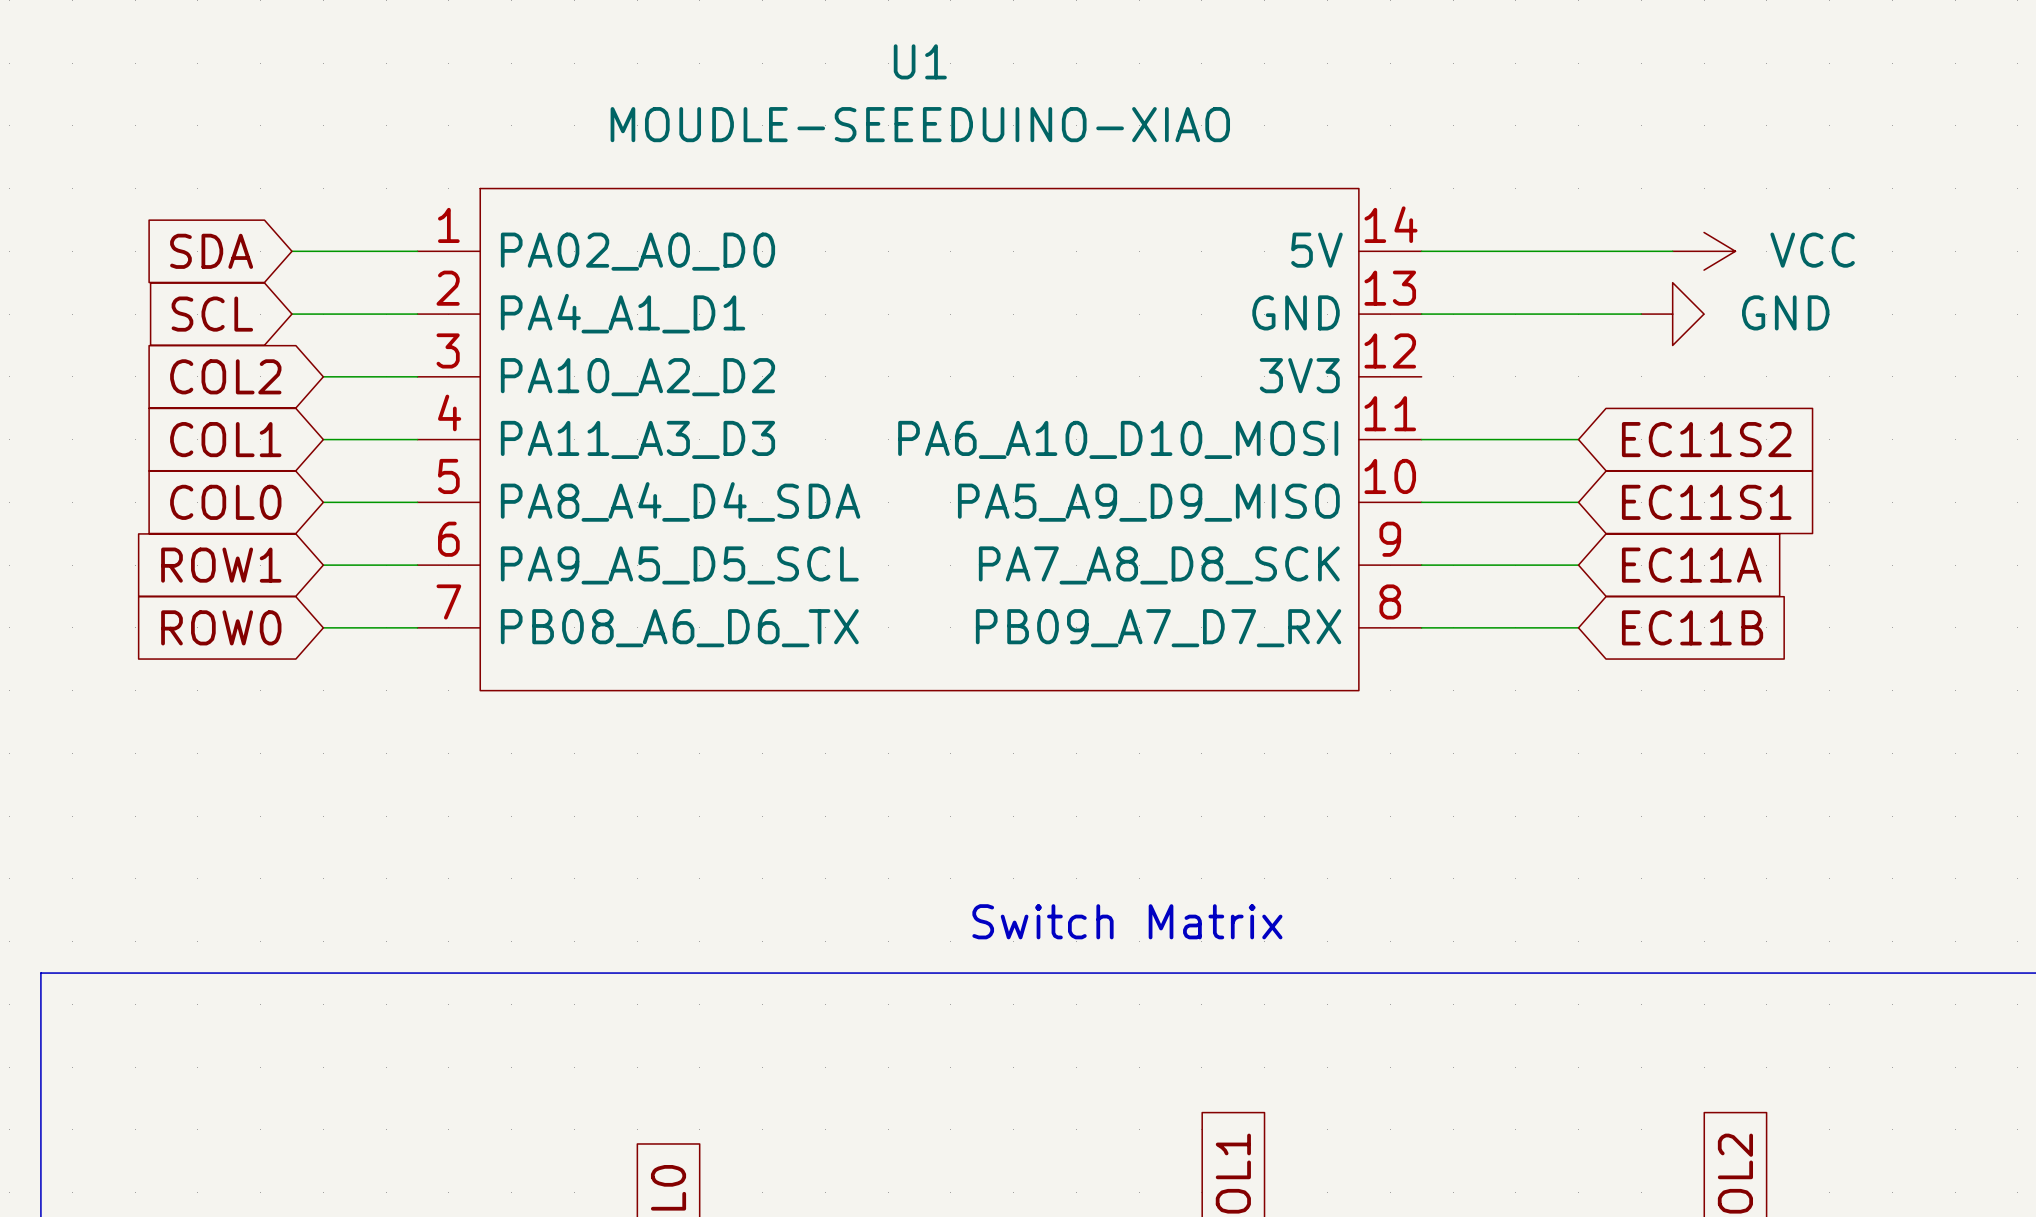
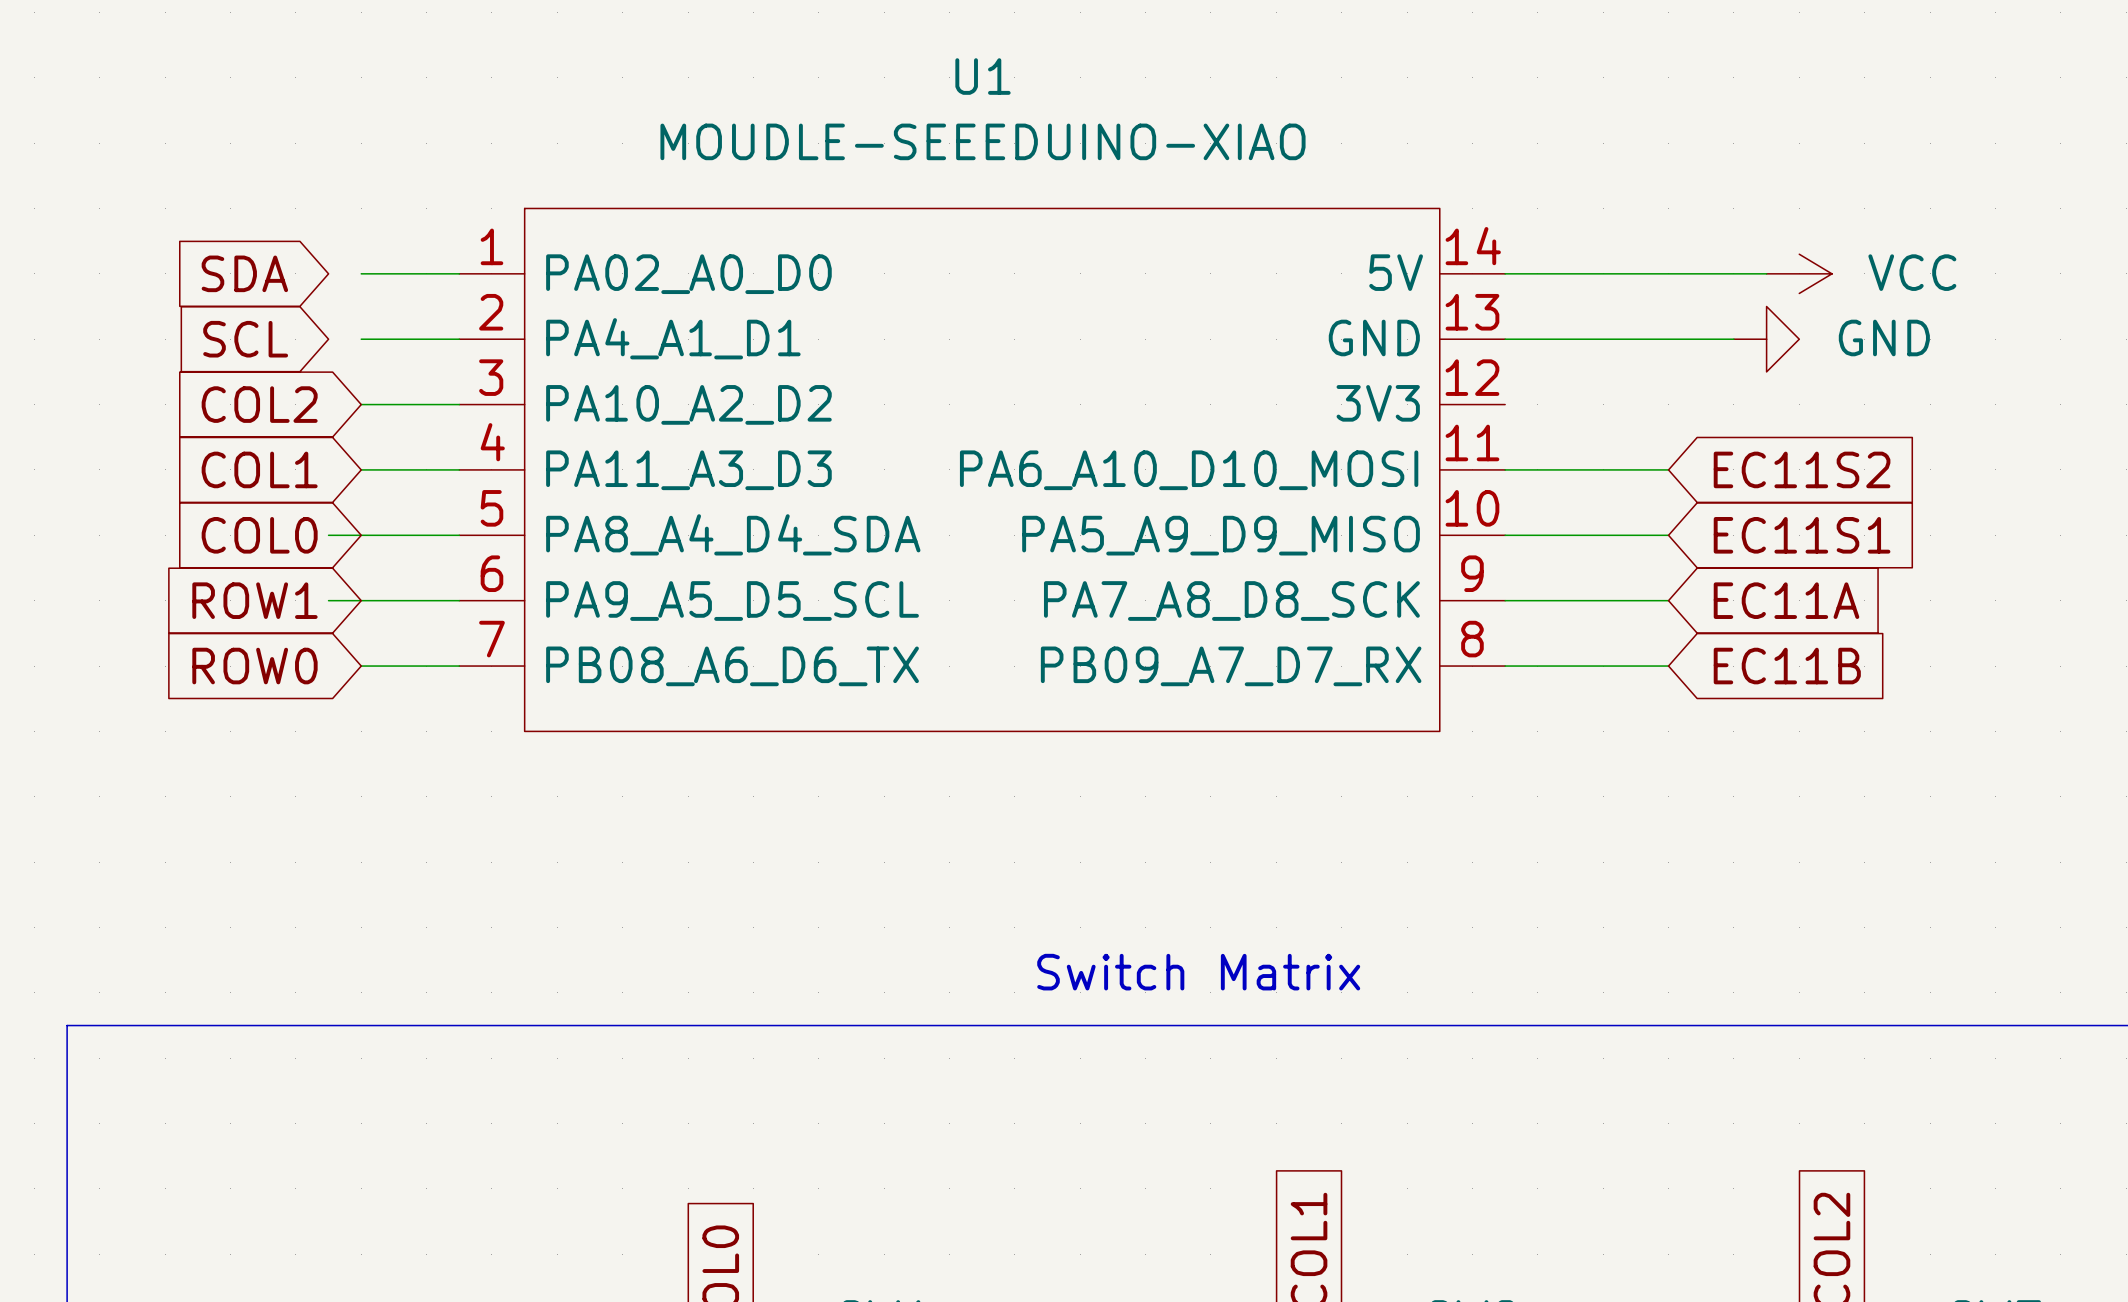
wire: (291, 251) (323, 251) -> (328, 535) (361, 535)
wire: (291, 314) (323, 314) -> (328, 600) (361, 600)

